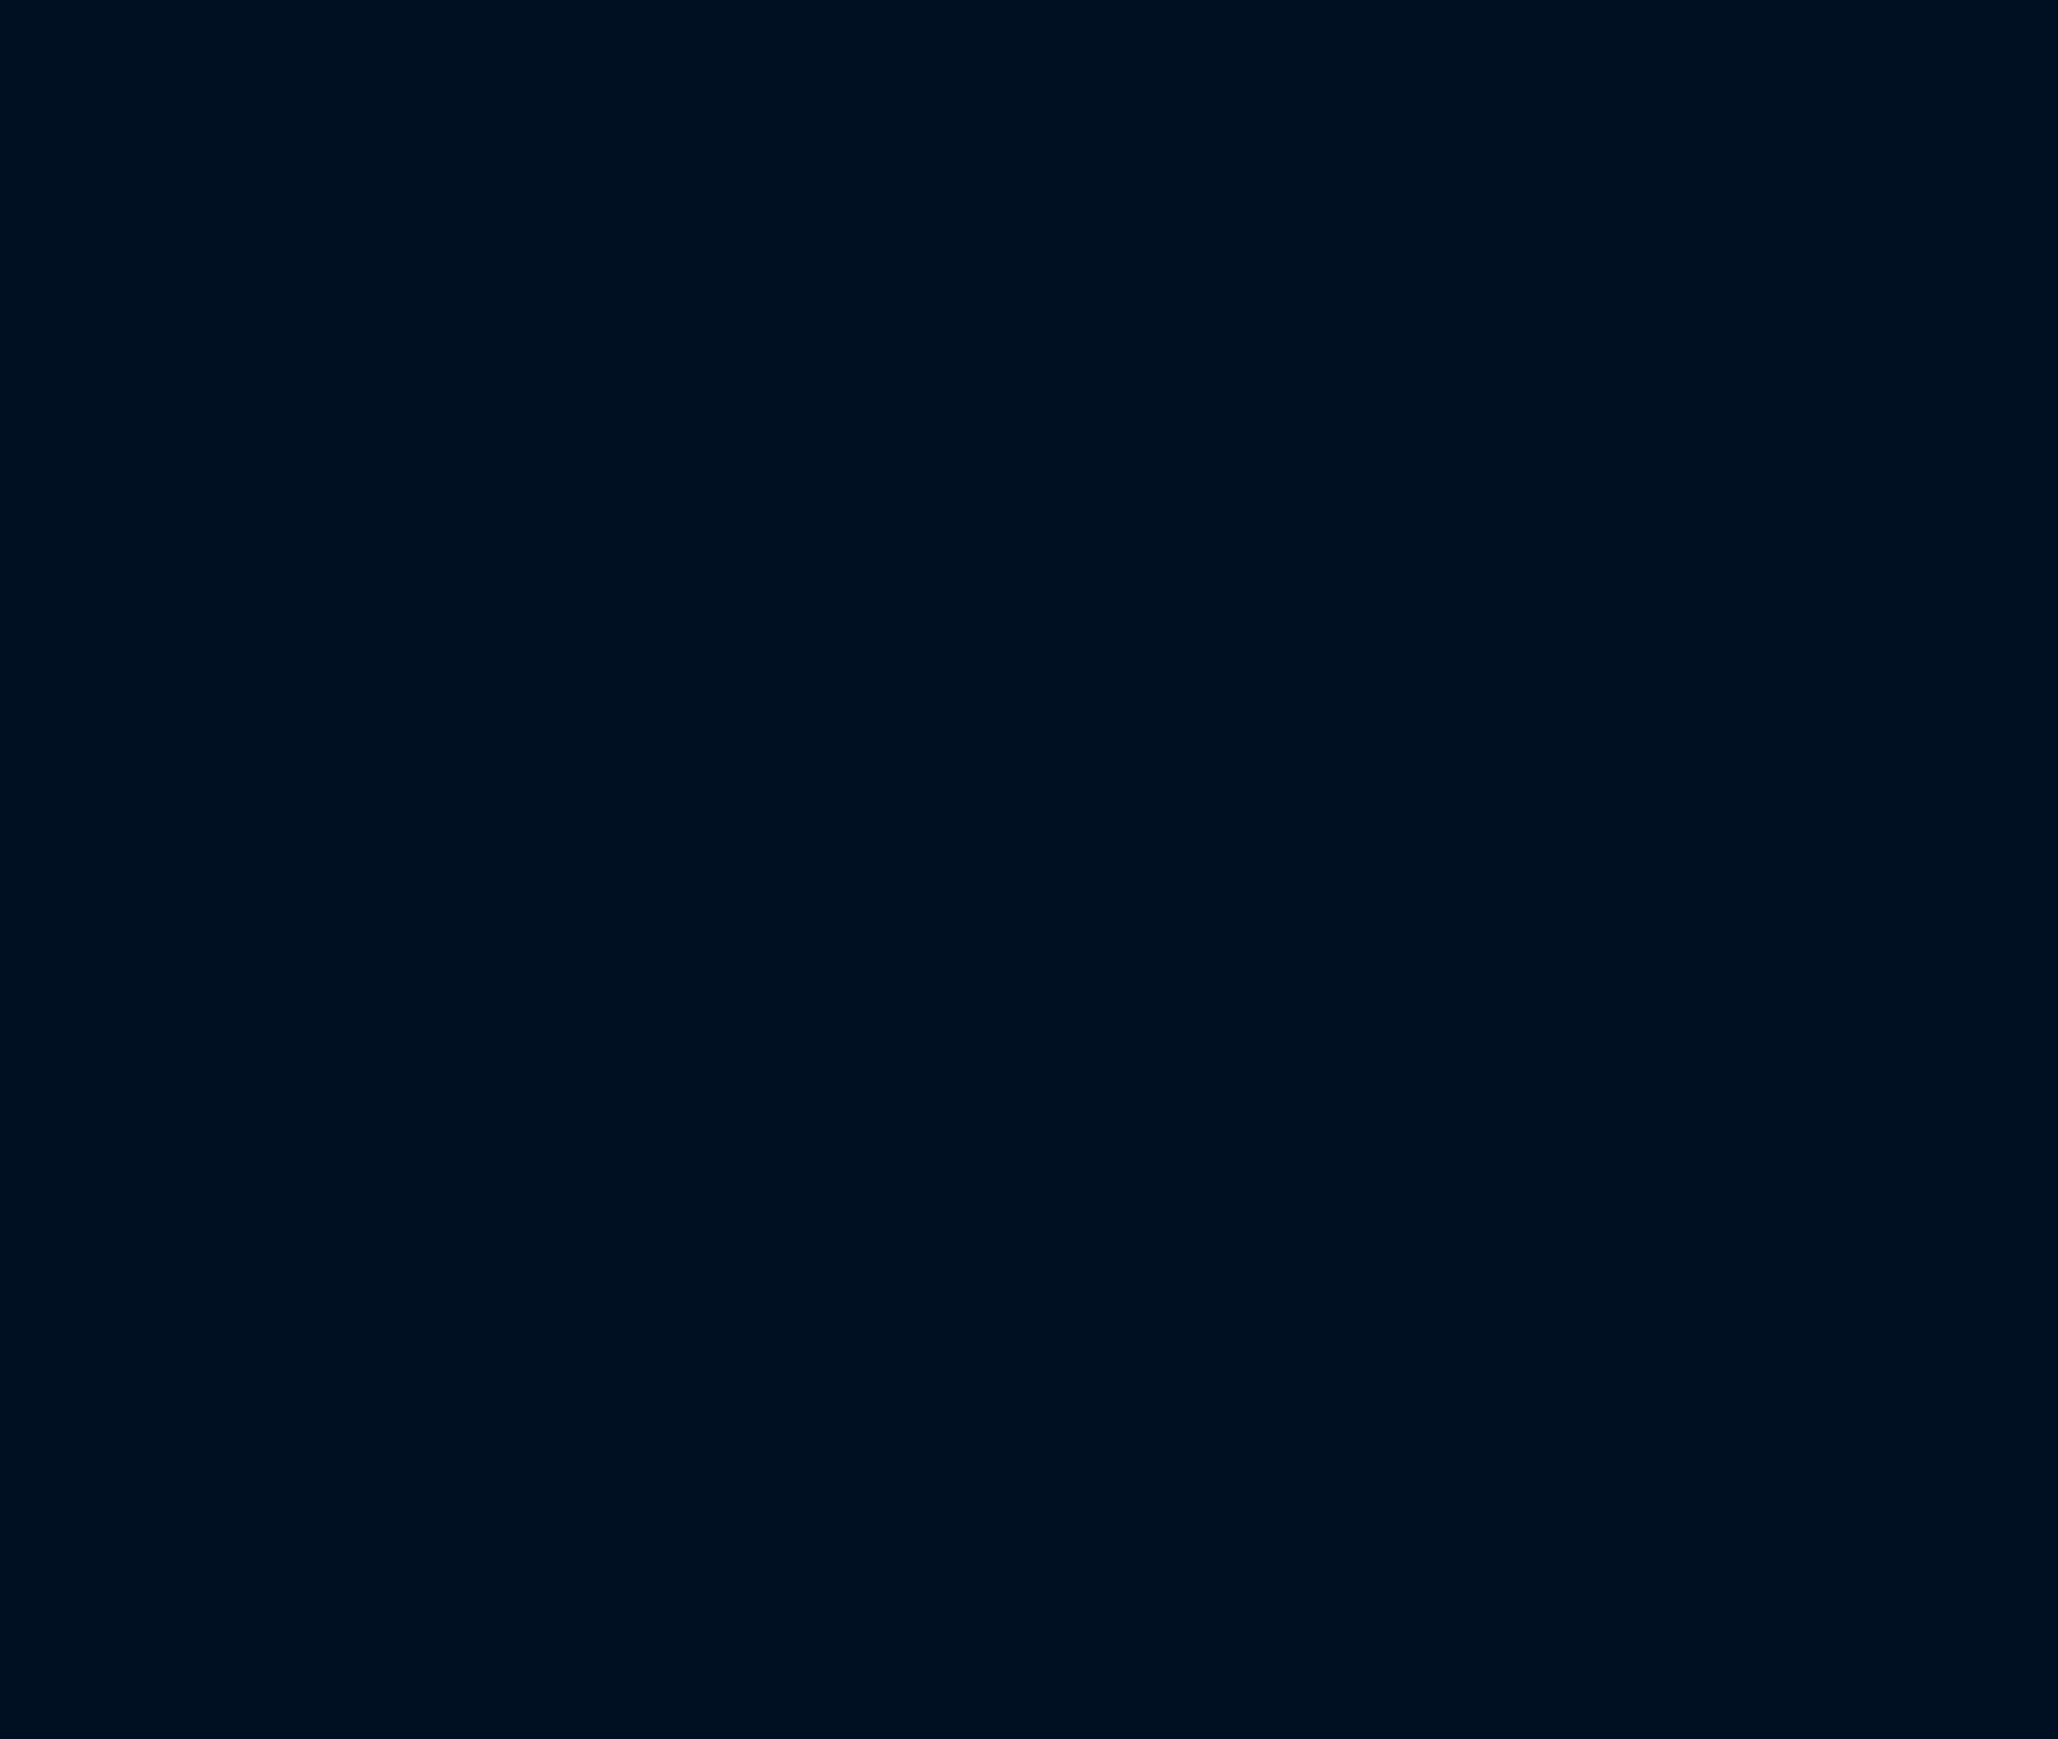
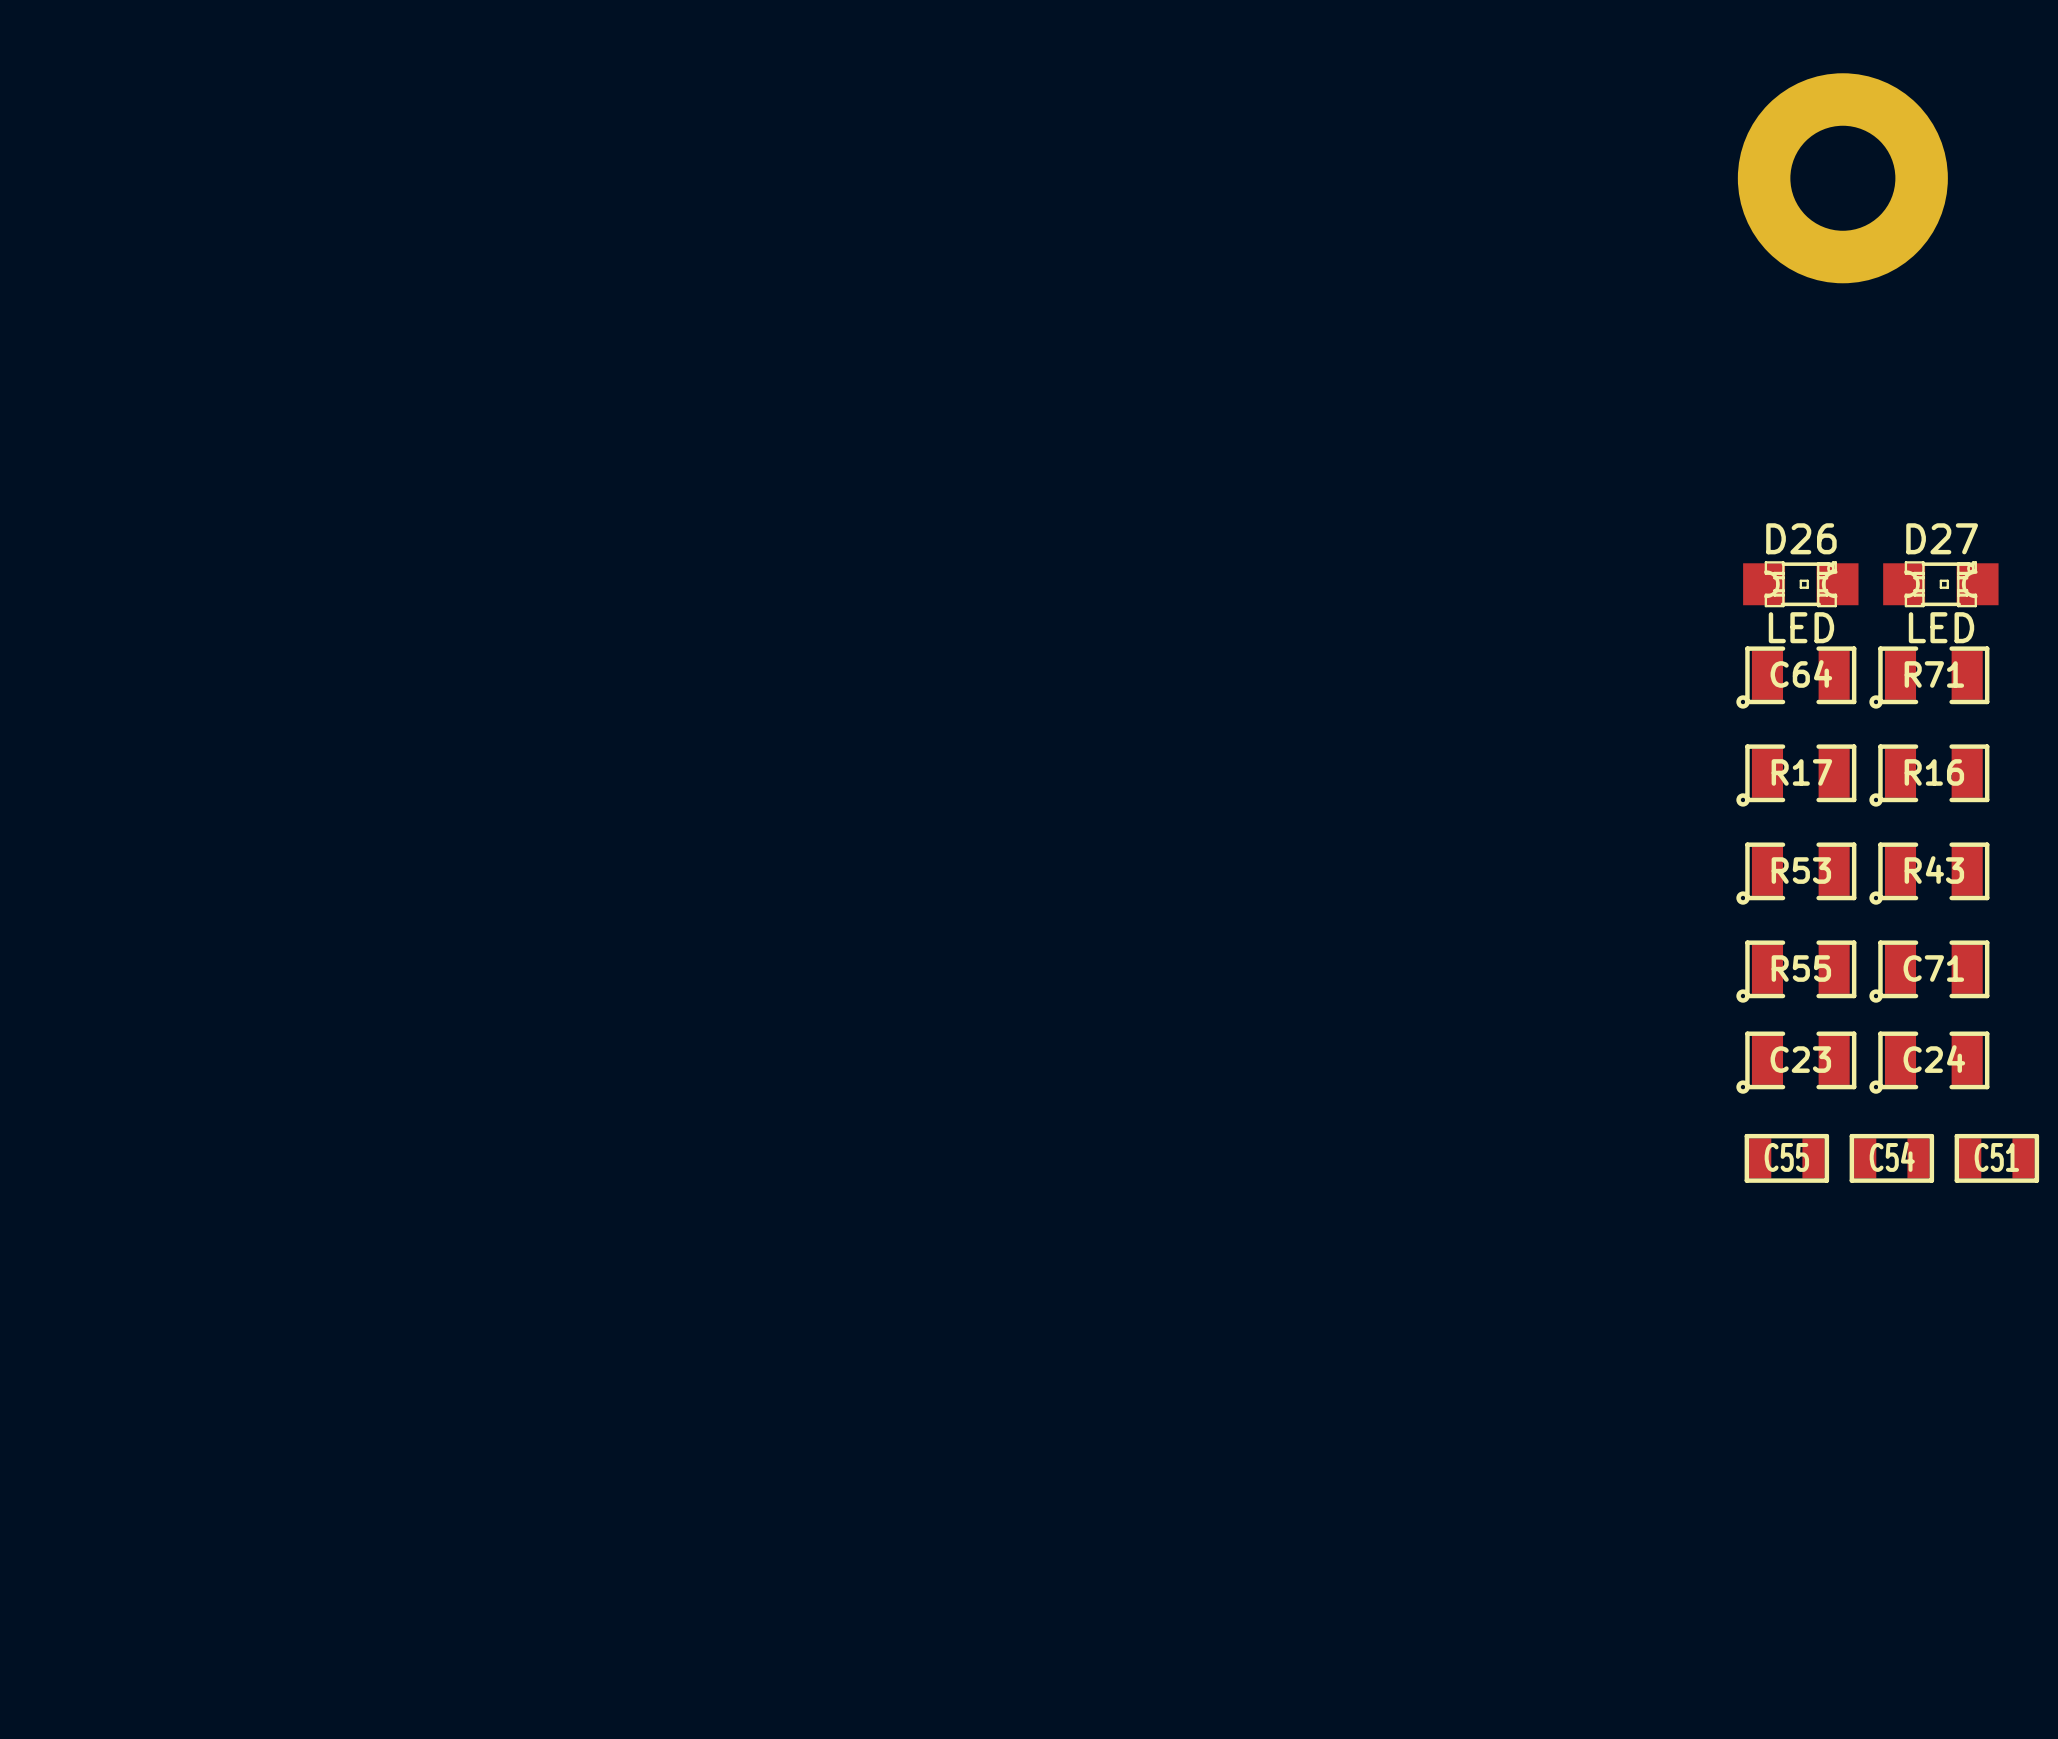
part: none -> (1842, 178)
D26: none -> LED (1800, 584)
D27: none -> LED (1940, 584)
C64: none -> (1796, 677)
R71: none -> (1929, 677)
R17: none -> (1796, 775)
R16: none -> (1929, 775)
R53: none -> (1796, 873)
R43: none -> (1929, 873)
R55: none -> (1796, 971)
C71: none -> (1929, 971)
C23: none -> (1796, 1062)
C24: none -> (1929, 1062)
C55: none -> (1786, 1158)
C54: none -> (1891, 1158)
C51: none -> (1996, 1158)

